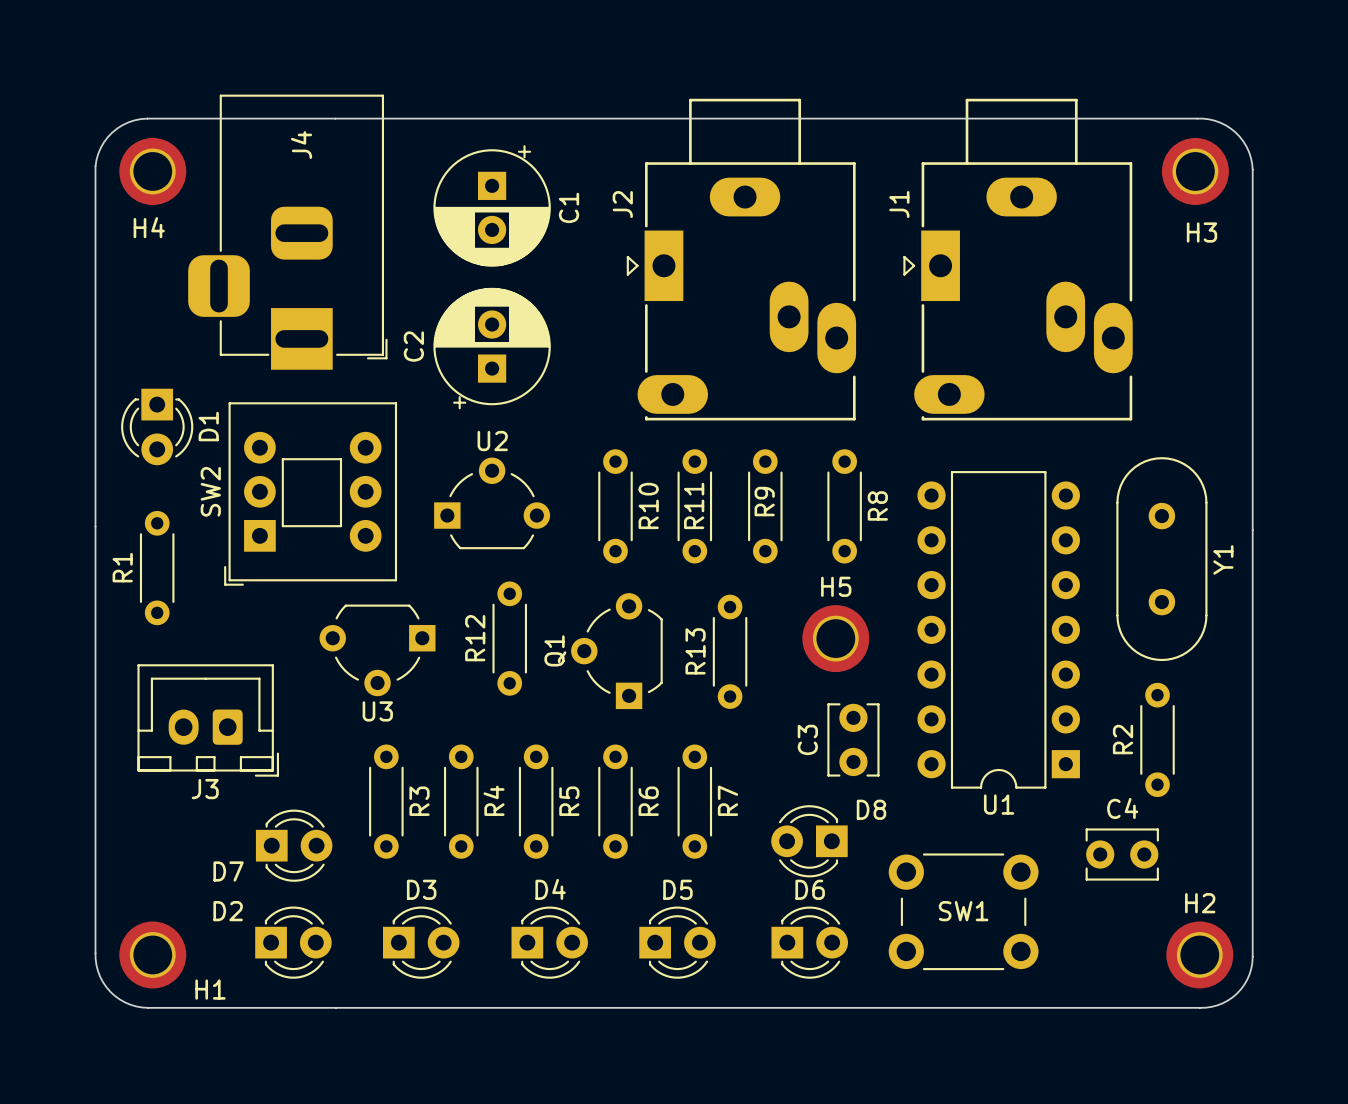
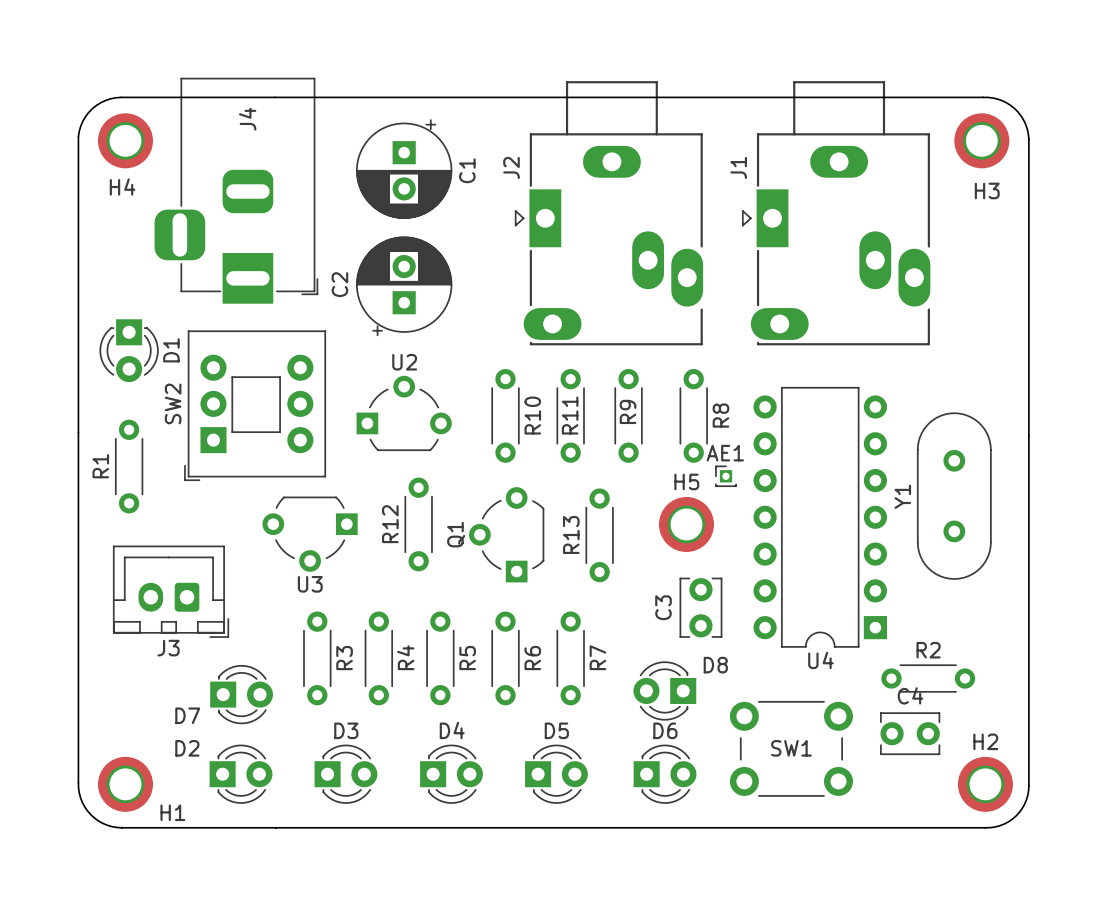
Y1 rotation: 0° (1161, 559) -> 180° (954, 496)
AE1: none -> (726, 476)
R2 rotation: 0° (1157, 739) -> 90° clockwise (928, 678)
R2 position: (1157, 739) -> (928, 678)
U1 name: U1 (999, 804) -> U4 (820, 660)
C4 position: (1122, 854) -> (910, 733)

